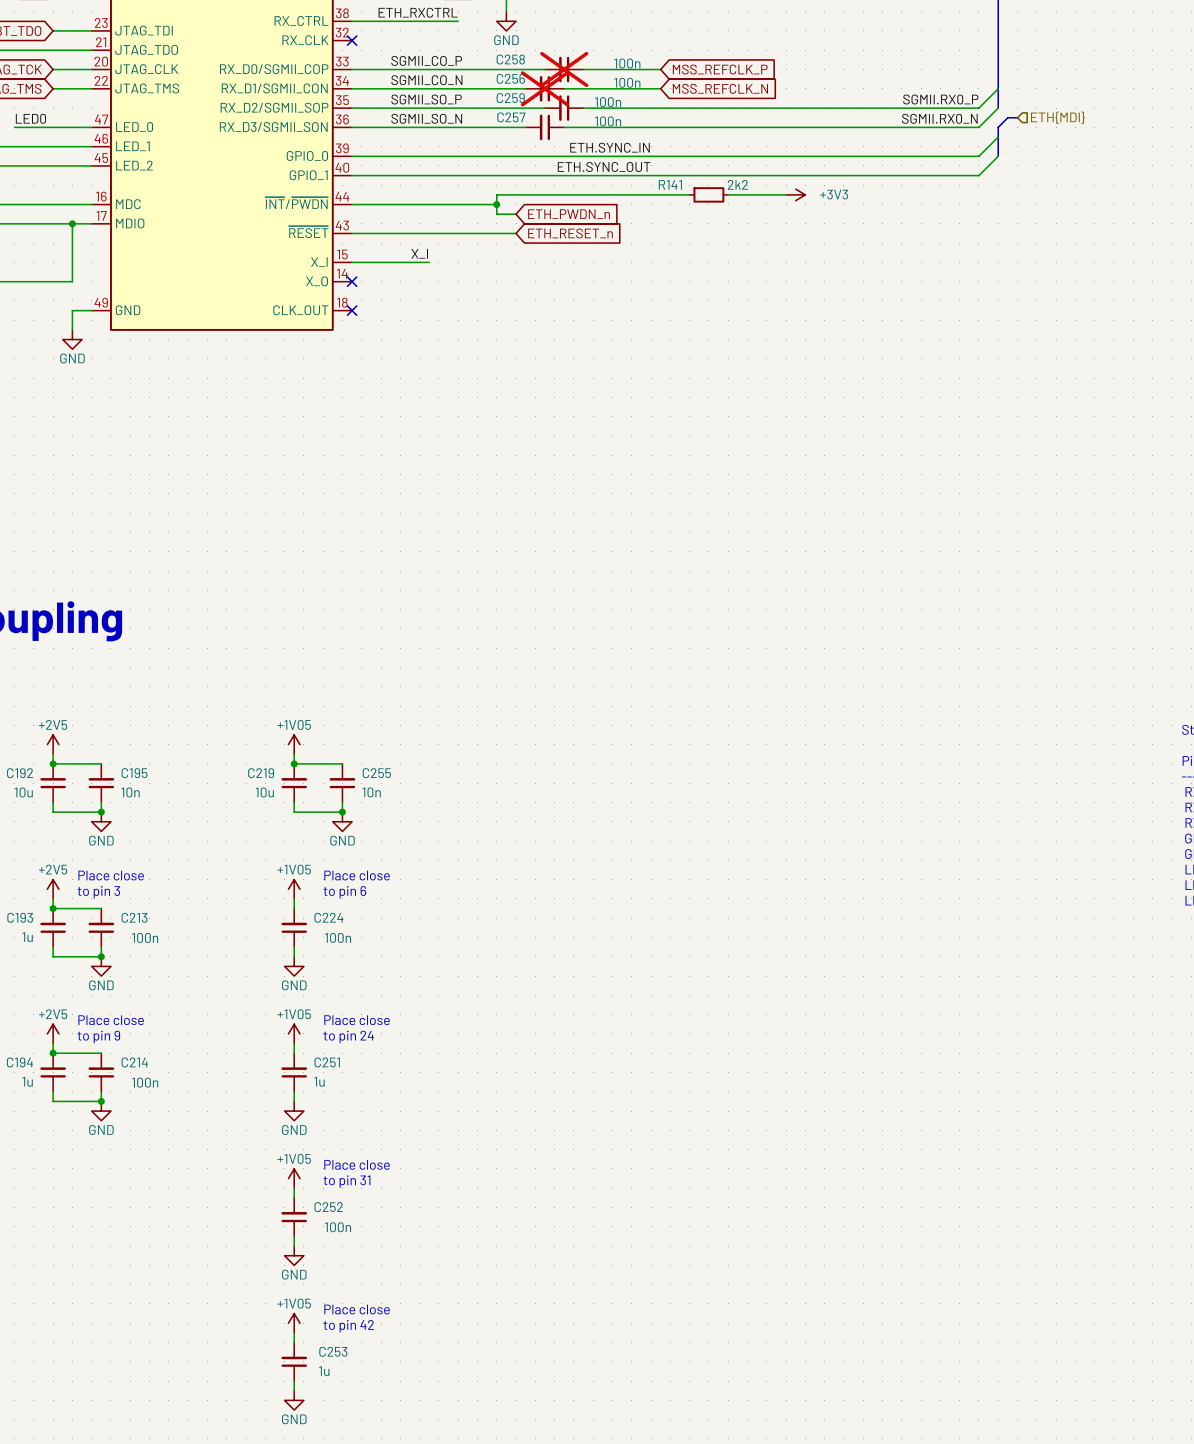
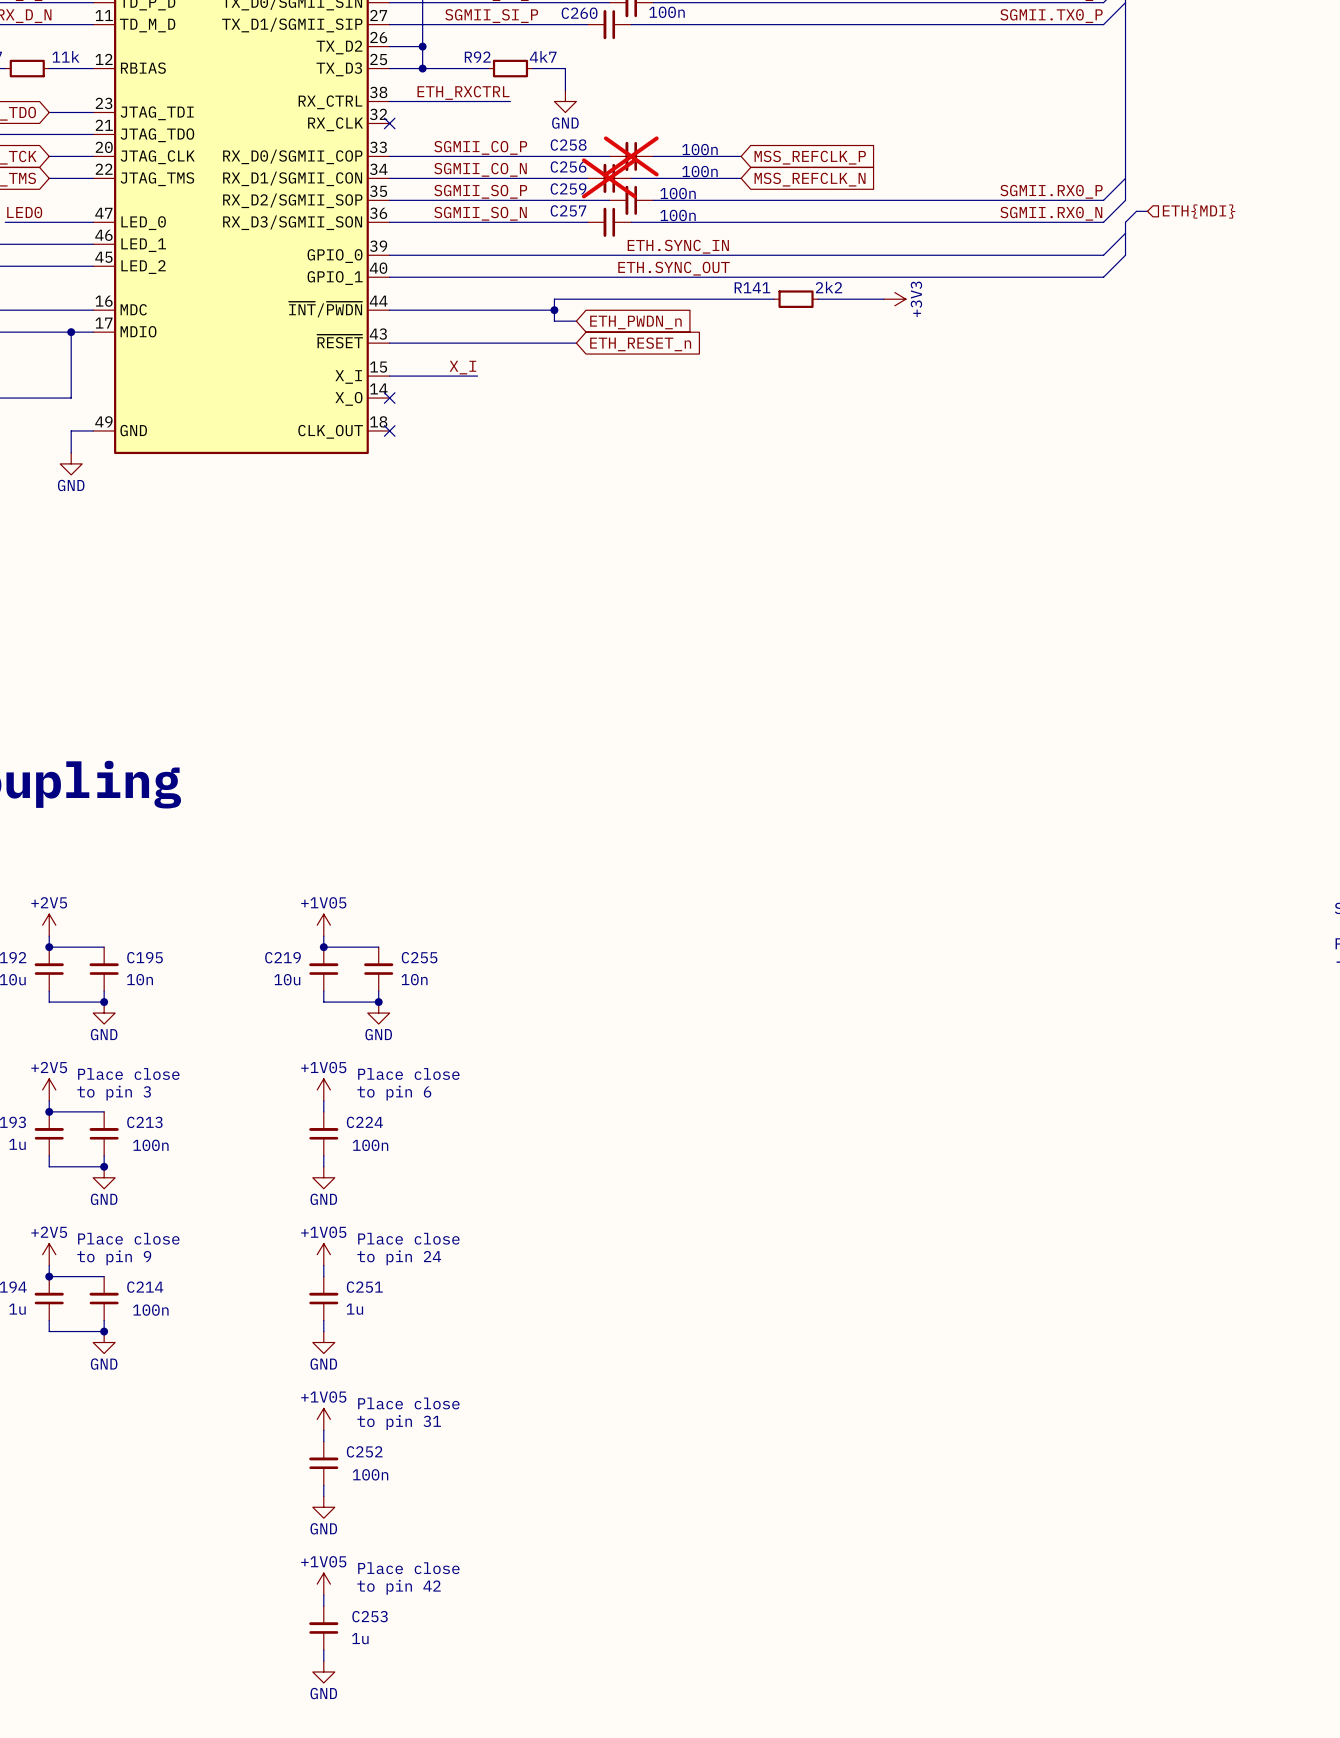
power symbol text rotation: 0° (834, 194) -> 90° counterclockwise (916, 299)

